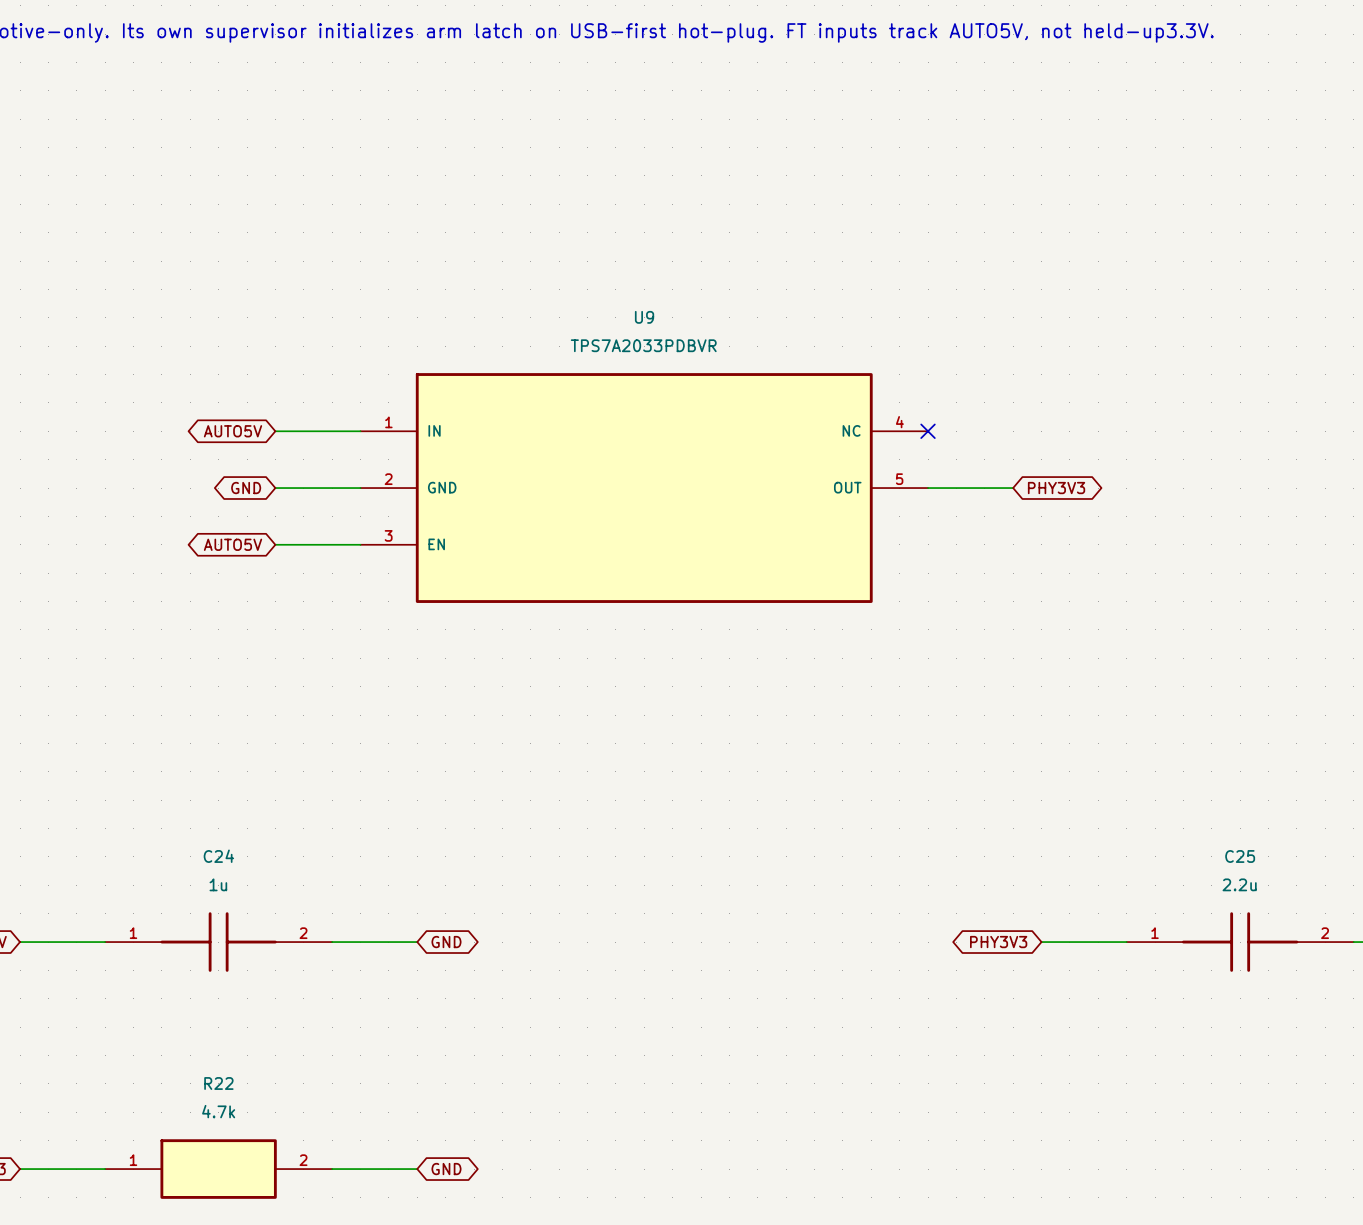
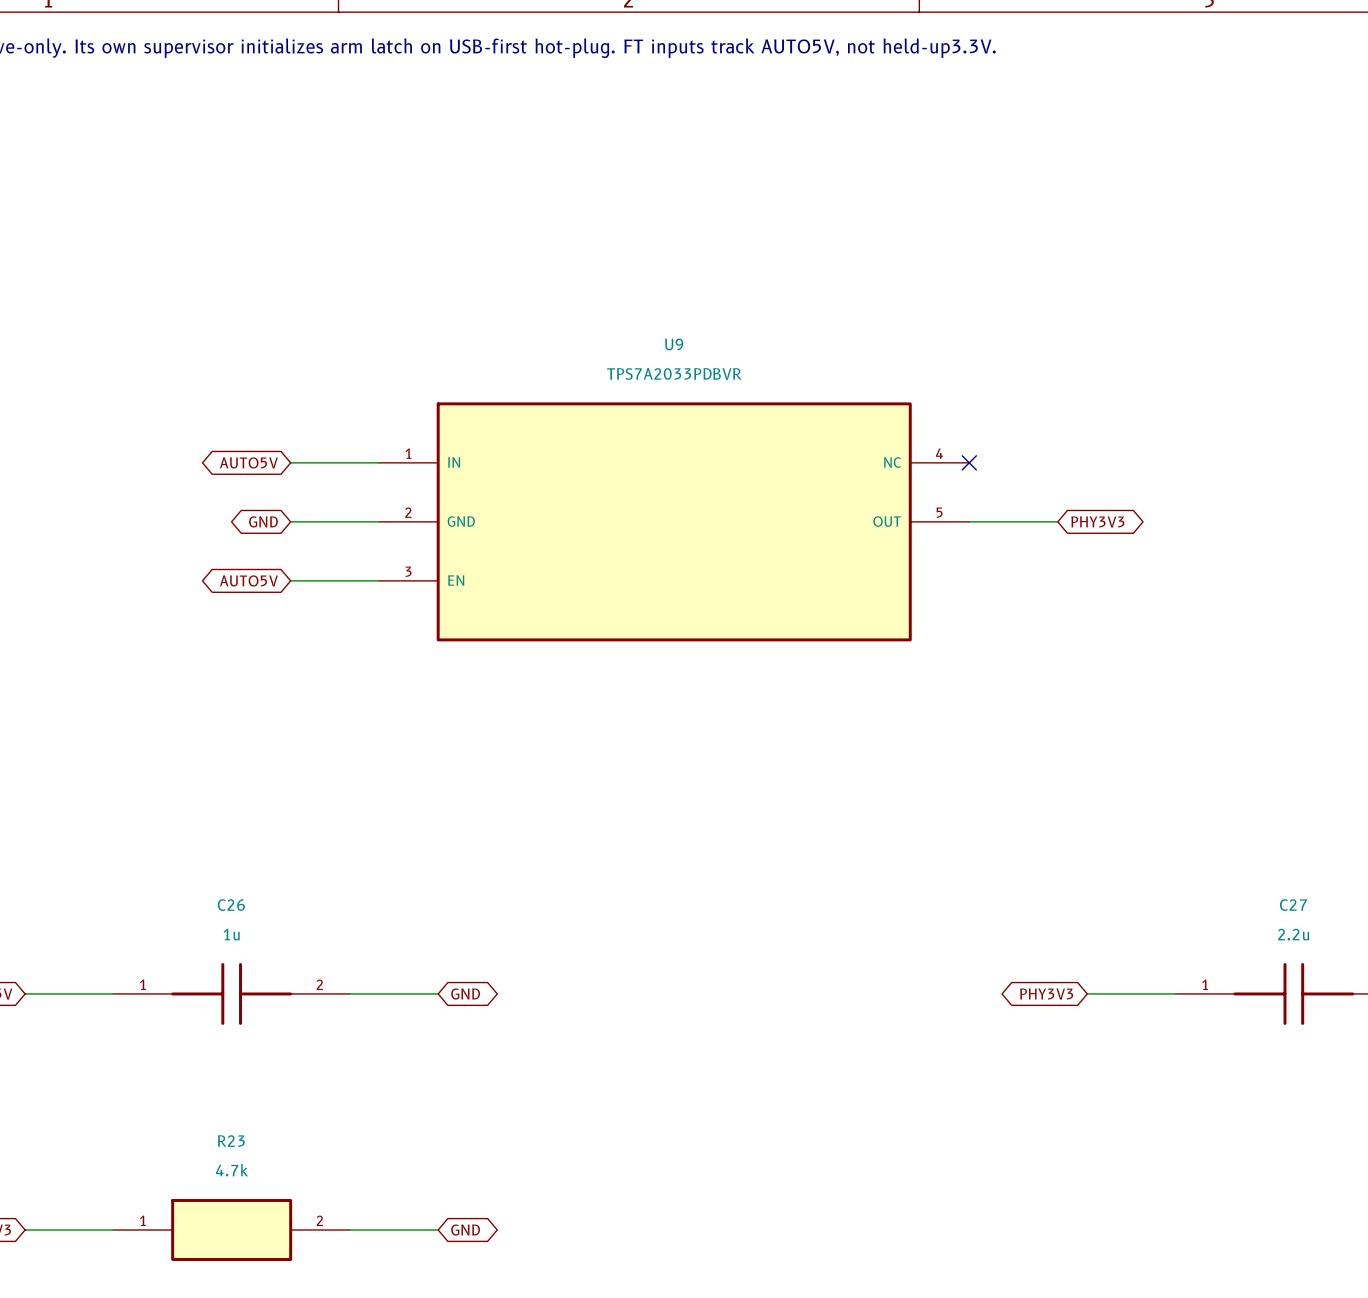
C24 name: C24 (218, 856) -> C26 (231, 905)
C25 name: C25 (1240, 856) -> C27 (1293, 905)
R22 name: R22 (218, 1083) -> R23 (231, 1141)

